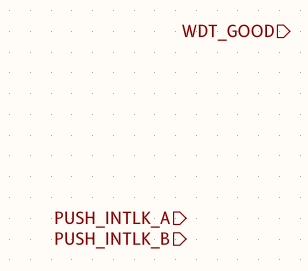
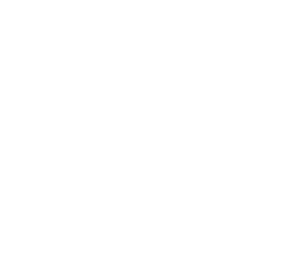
hierarchical label: WDT_GOOD (228, 32) -> none
hierarchical label: PUSH_INTLK_A (112, 219) -> none
hierarchical label: PUSH_INTLK_B (112, 240) -> none

